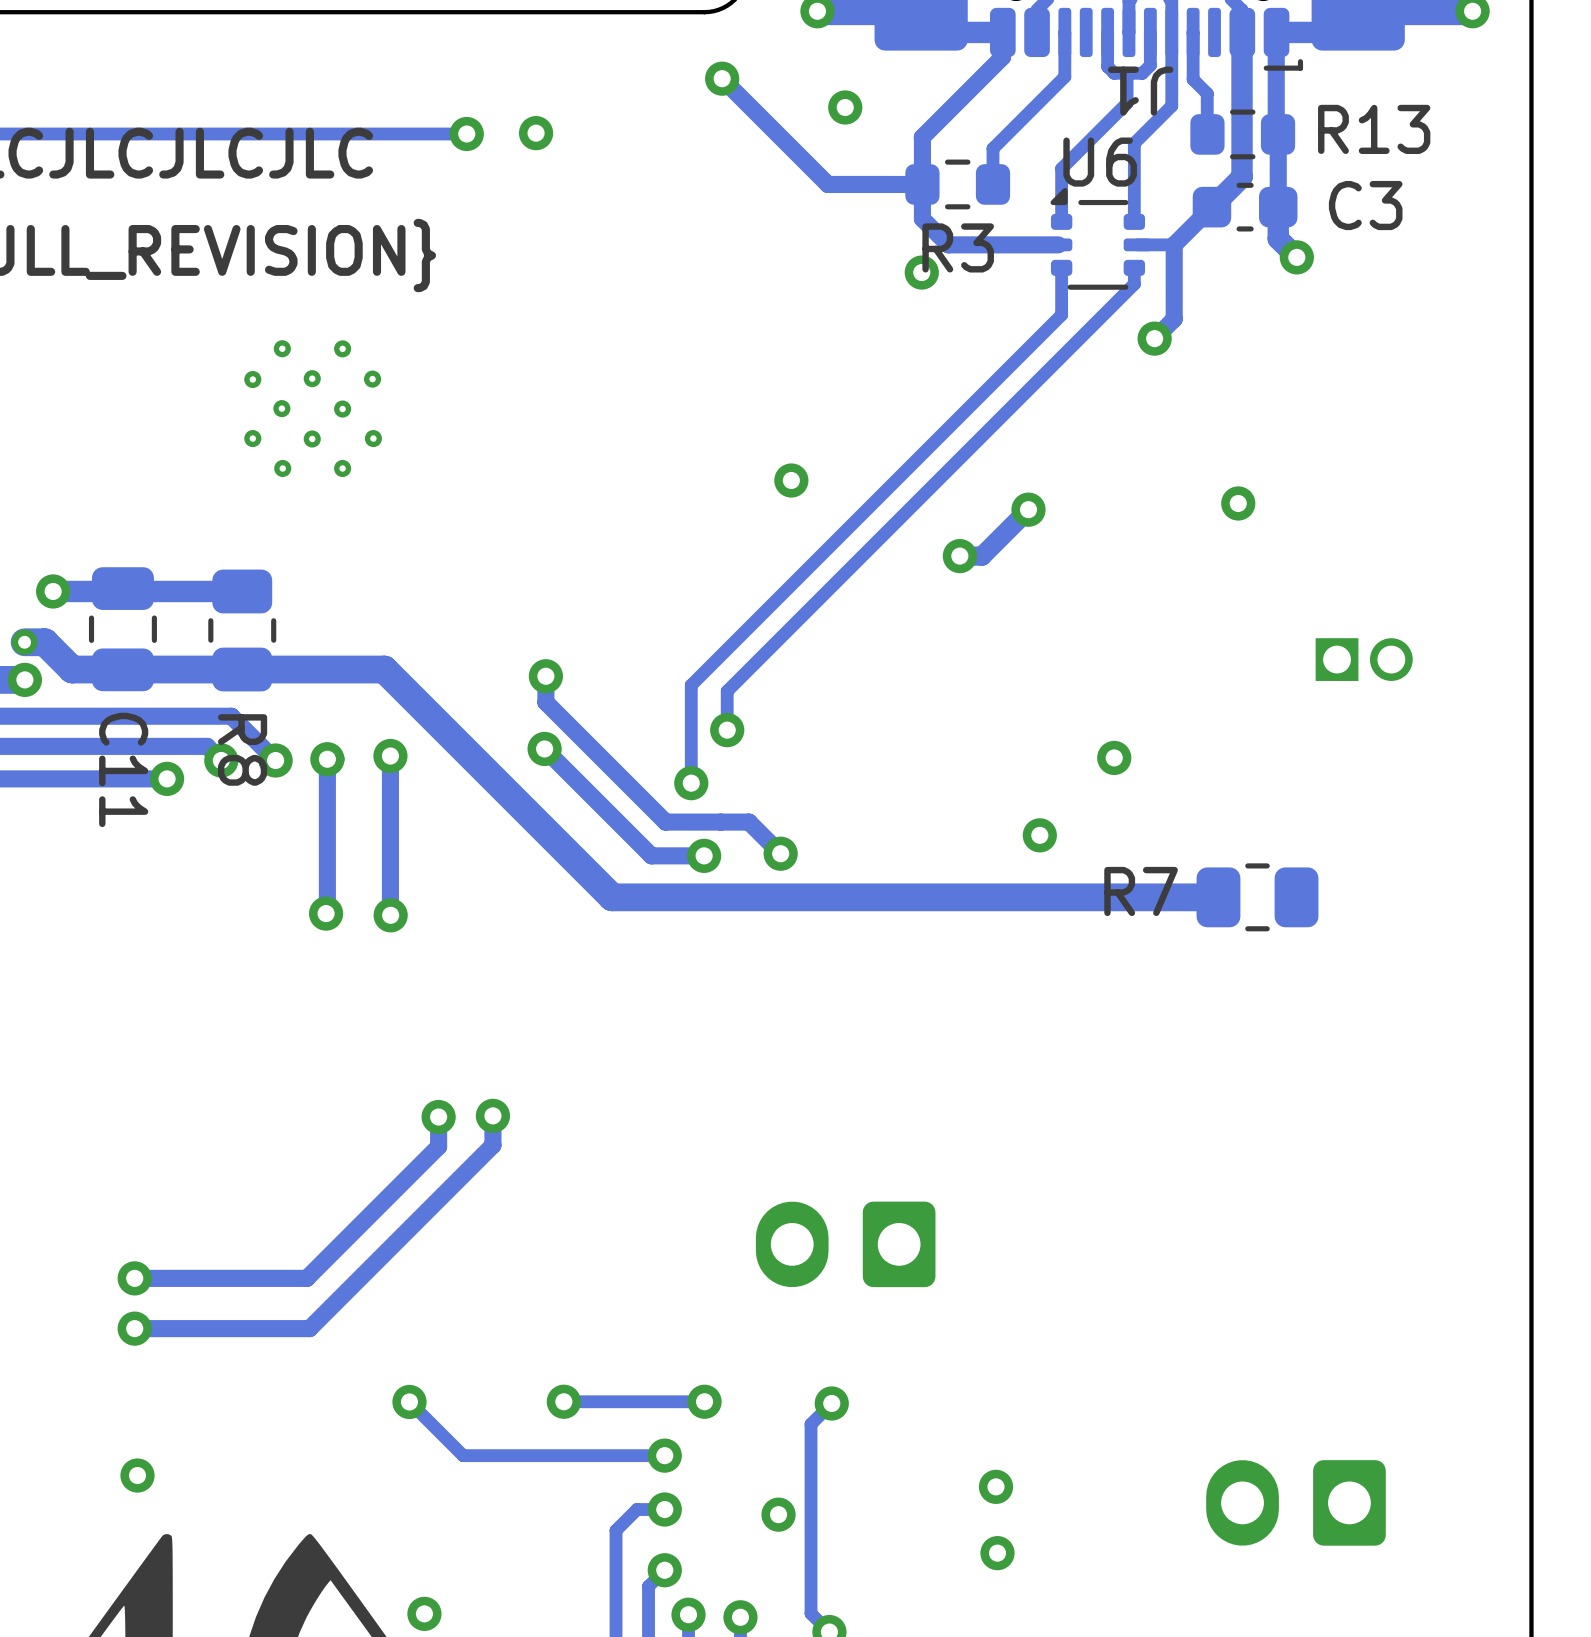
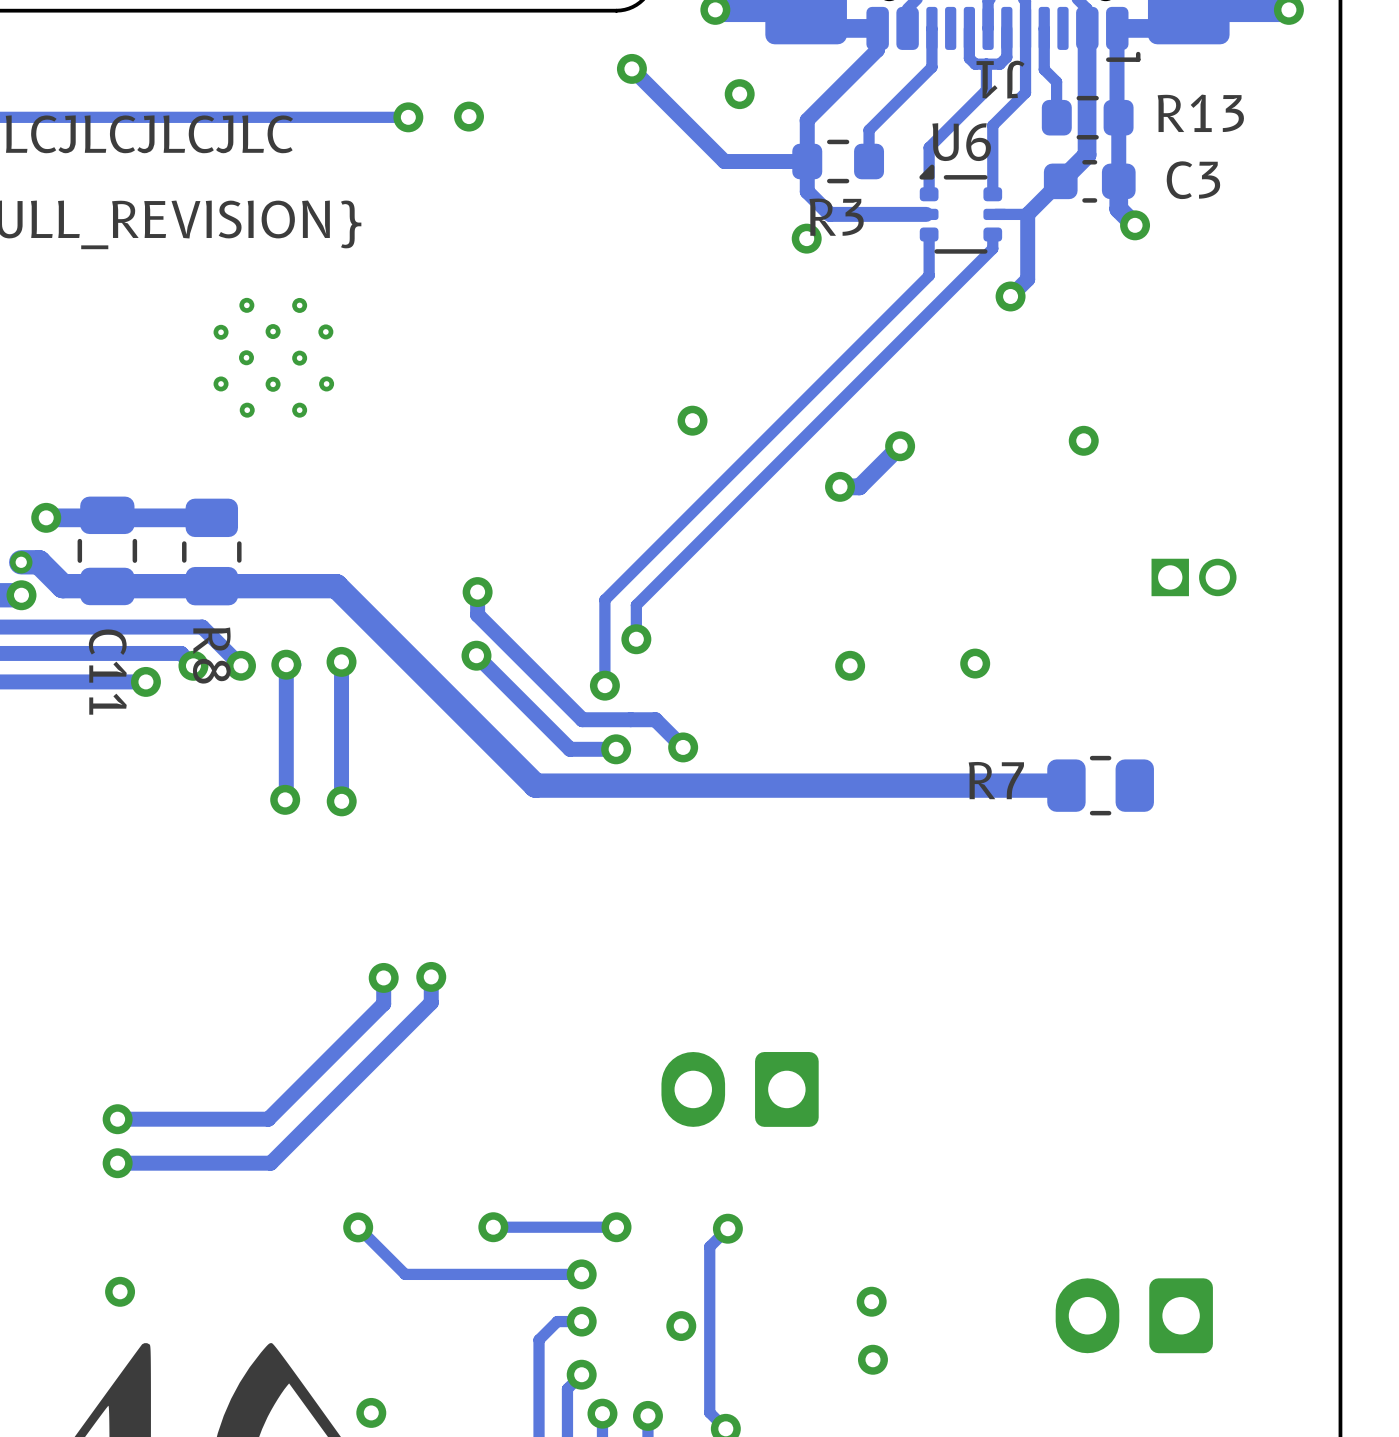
via position: (1039, 835) -> (850, 665)

